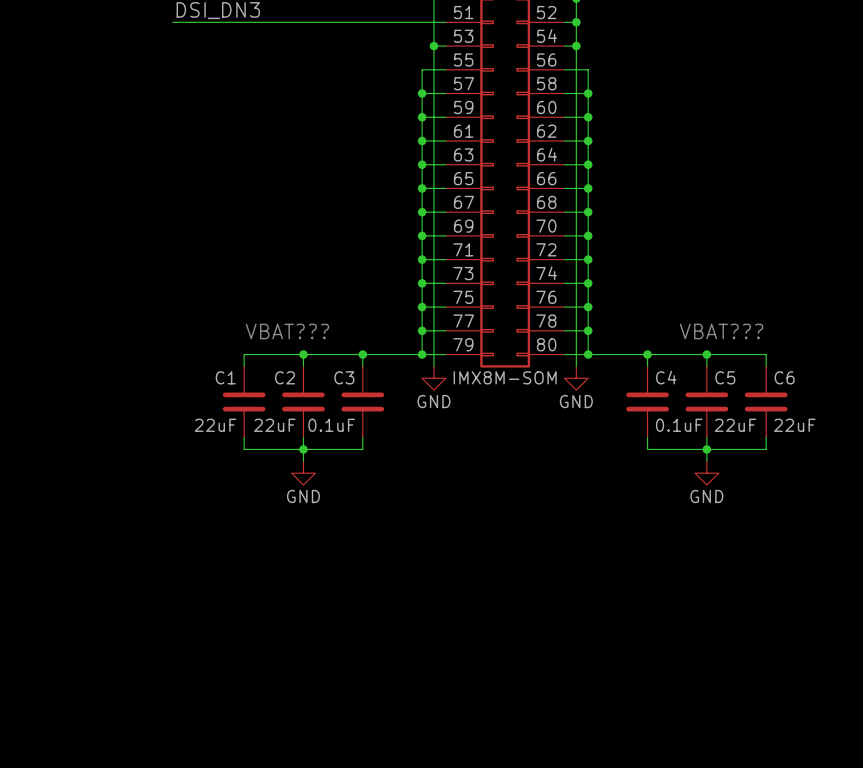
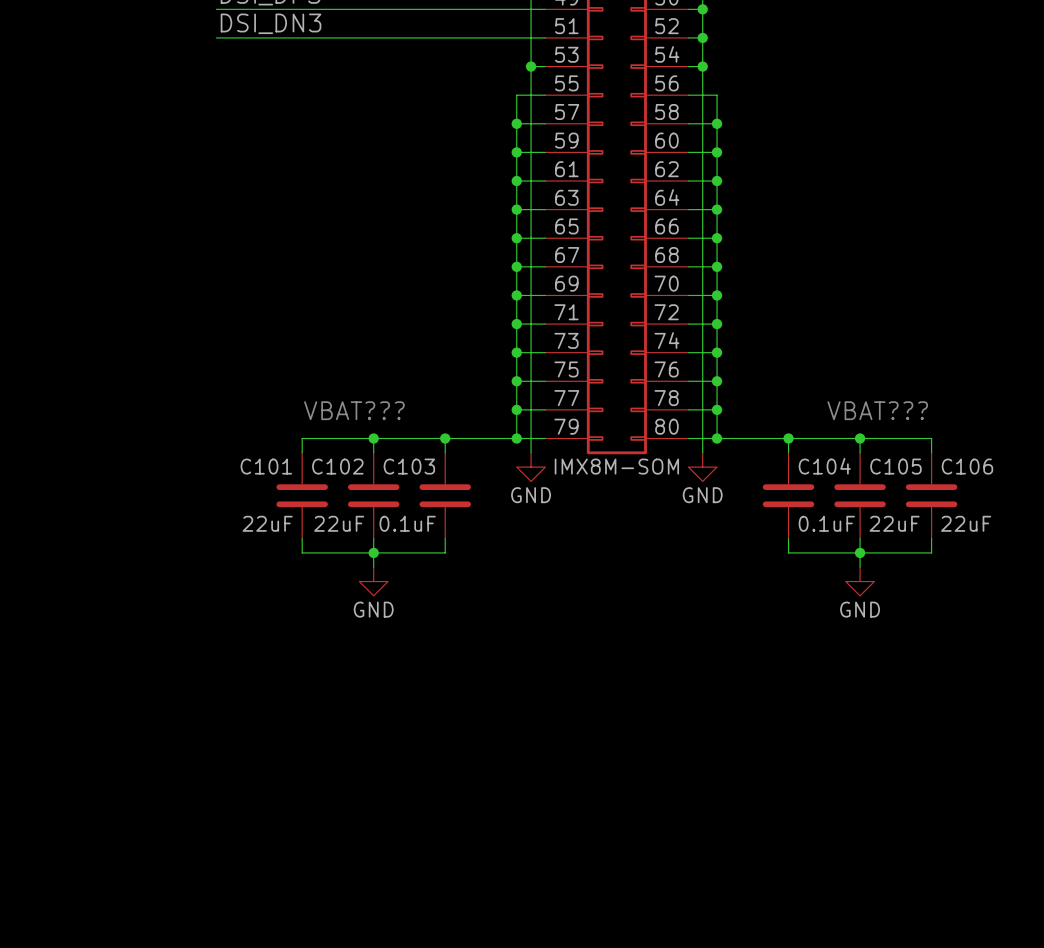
C1 name: C1 (225, 377) -> C101 (266, 466)
C2 name: C2 (285, 377) -> C102 (337, 466)
C3 name: C3 (344, 377) -> C103 (409, 466)
C4 name: C4 (666, 377) -> C104 (824, 466)
C5 name: C5 (725, 377) -> C105 (895, 466)
C6 name: C6 (784, 377) -> C106 (967, 466)

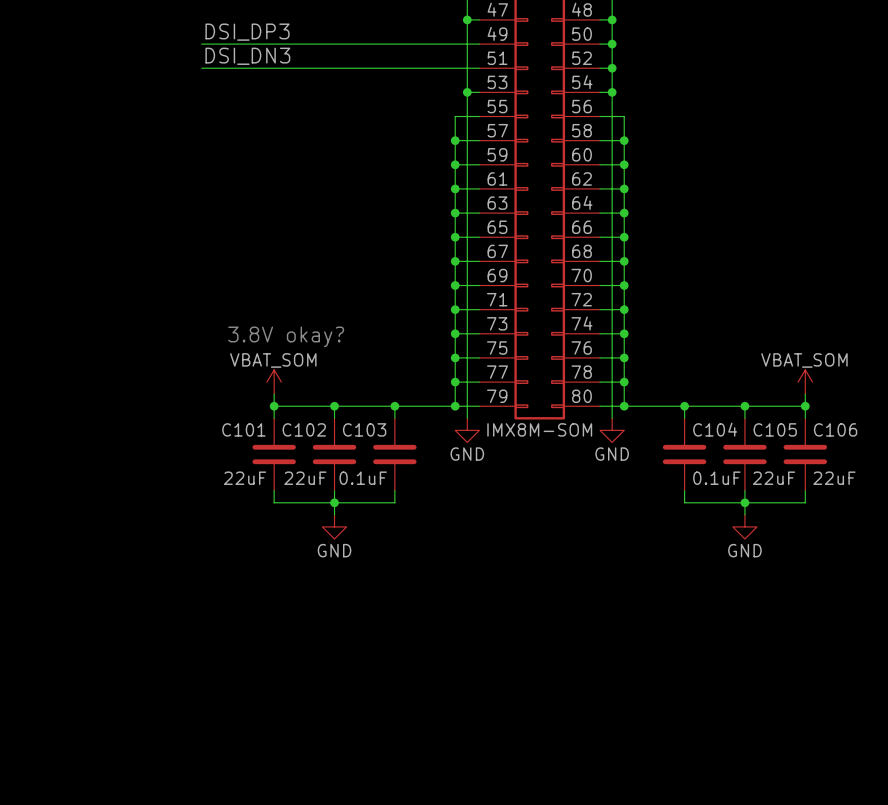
text: none -> 3.8V okay? (286, 336)
power symbol: none -> VBAT_SOM (274, 382)
power symbol: none -> VBAT_SOM (805, 382)
text: VBAT??? (354, 410) -> none
text: VBAT??? (877, 410) -> none
wire: none -> (274, 394) (274, 406)
wire: none -> (805, 394) (805, 406)
junction: none -> (274, 406)
junction: none -> (805, 406)

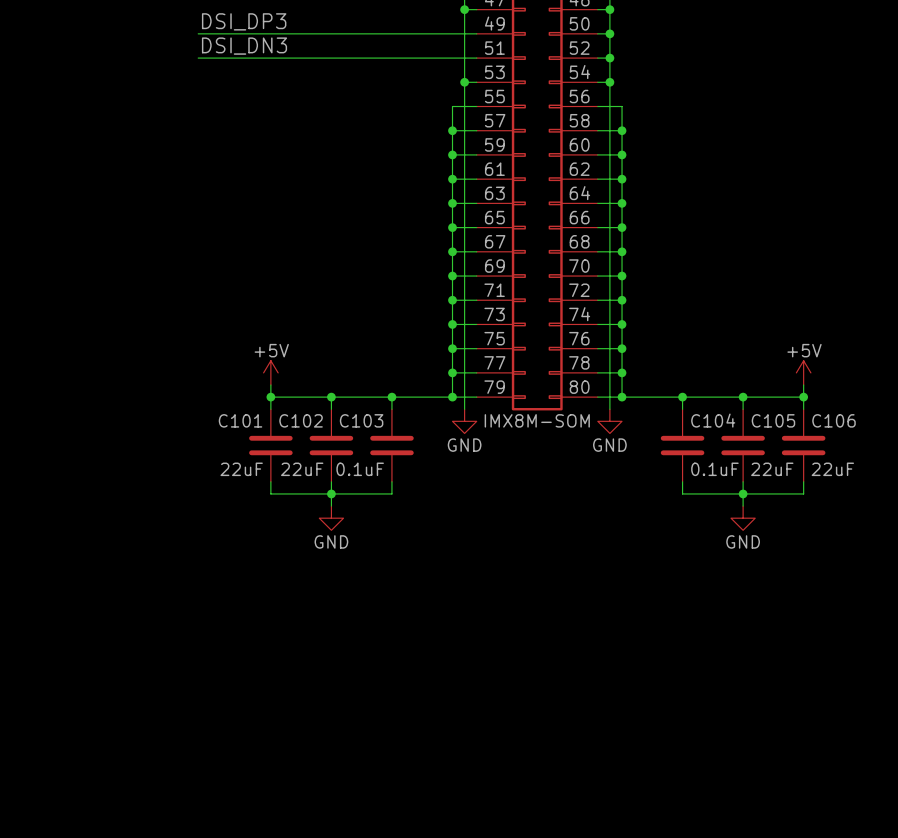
text: 3.8V okay? (286, 336) -> none
power symbol: VBAT_SOM (274, 382) -> +5V (270, 372)
power symbol: VBAT_SOM (805, 382) -> +5V (803, 372)

